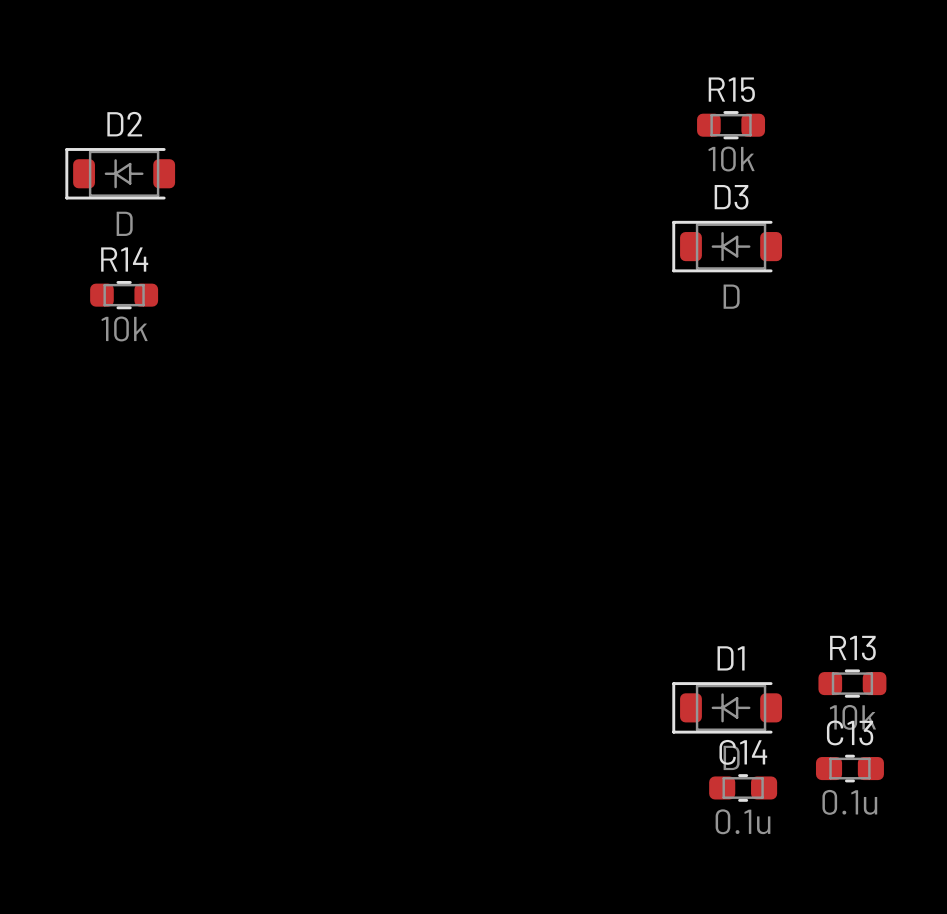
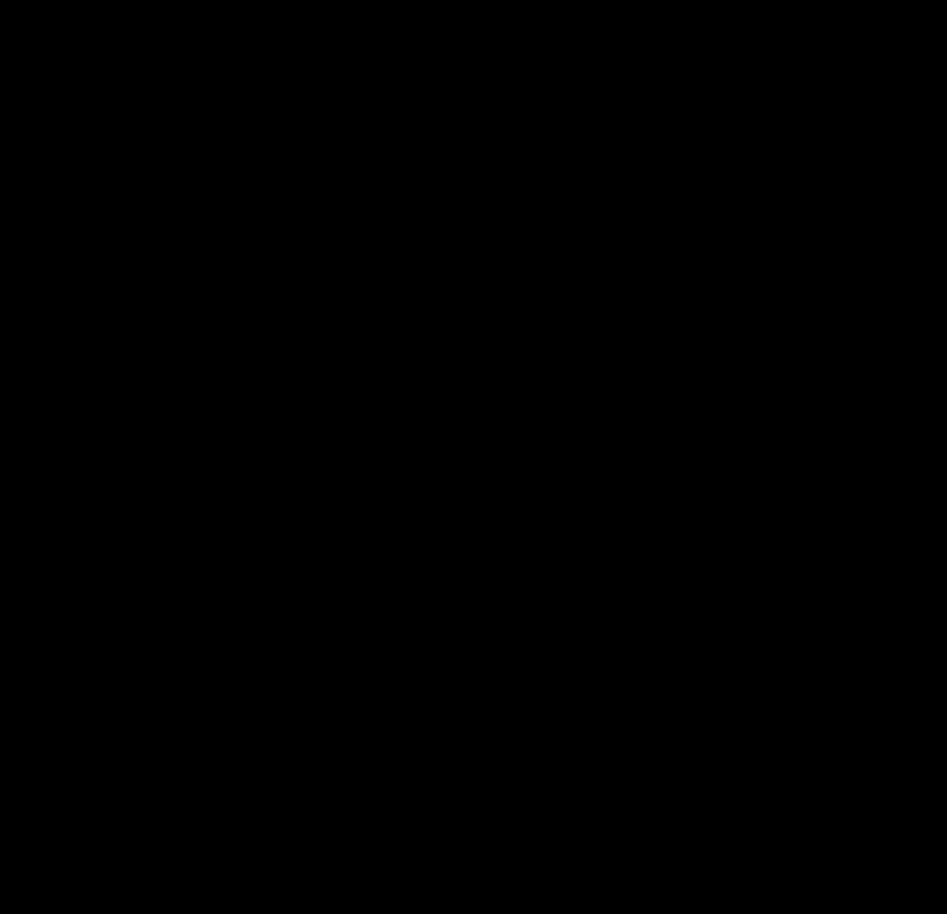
R15: 10k (731, 125) -> none
D2: D (120, 173) -> none
D3: D (727, 246) -> none
R14: 10k (124, 295) -> none
R13: 10k (852, 683) -> none
D1: D (727, 707) -> none
C13: 0.1u (849, 768) -> none
C14: 0.1u (743, 787) -> none

